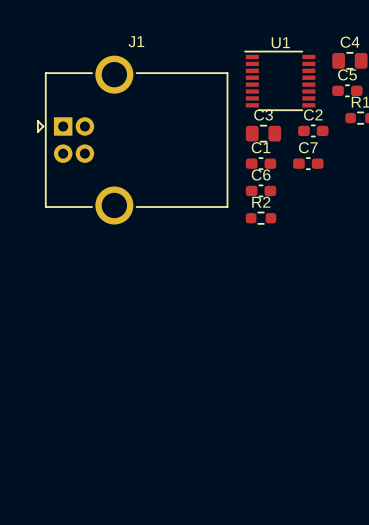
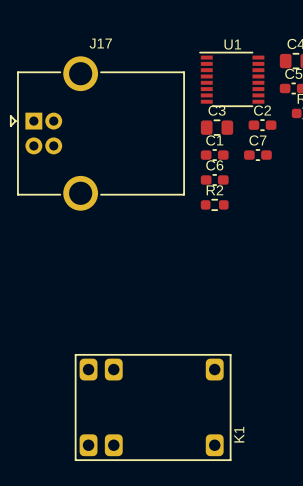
J1 name: J1 (136, 41) -> J17 (100, 43)
K1: none -> (153, 407)

